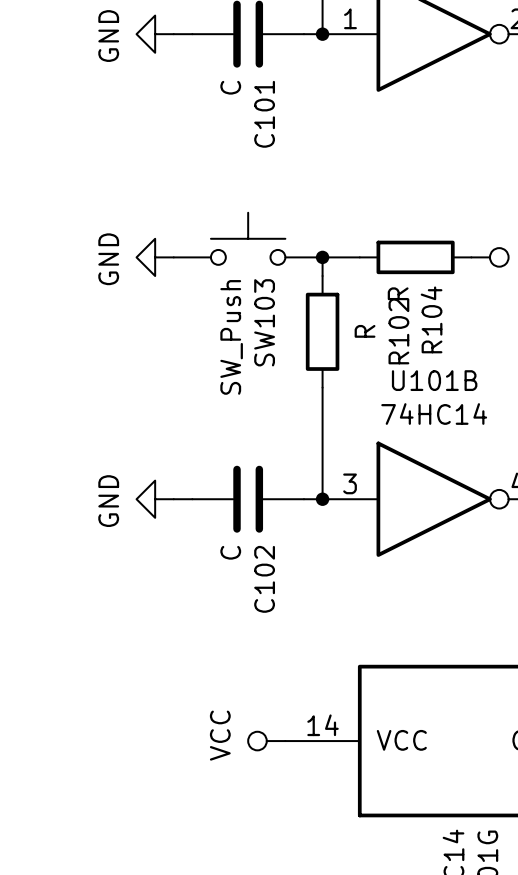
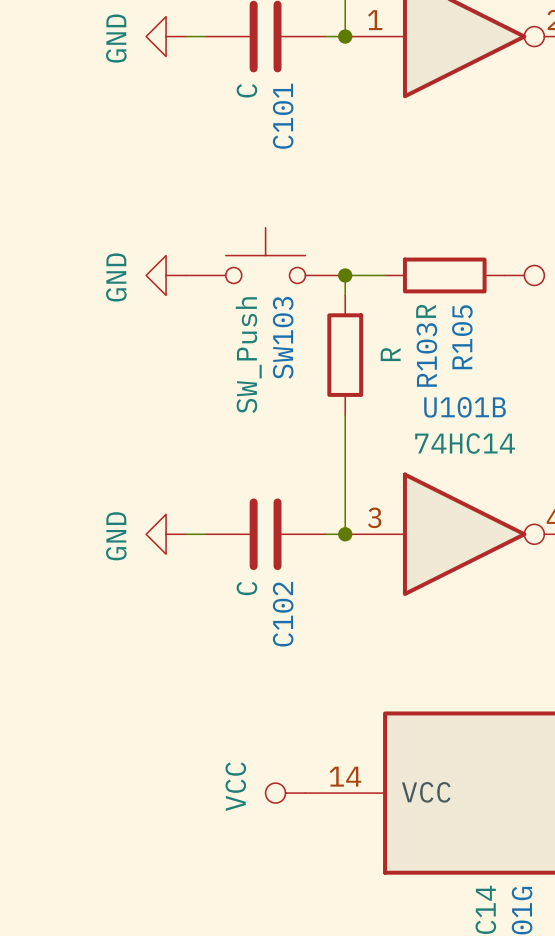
R104 name: R104 (431, 319) -> R105 (462, 337)
R102 name: R102 (398, 331) -> R103 (426, 354)

